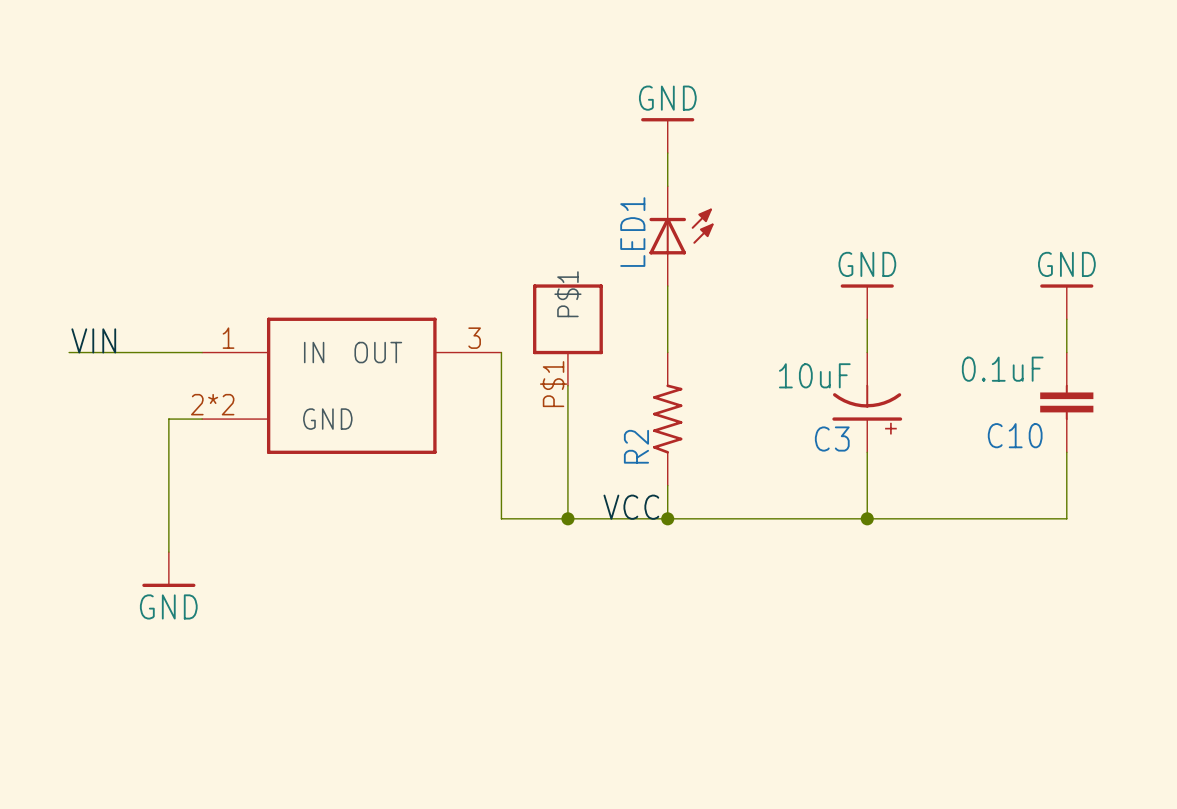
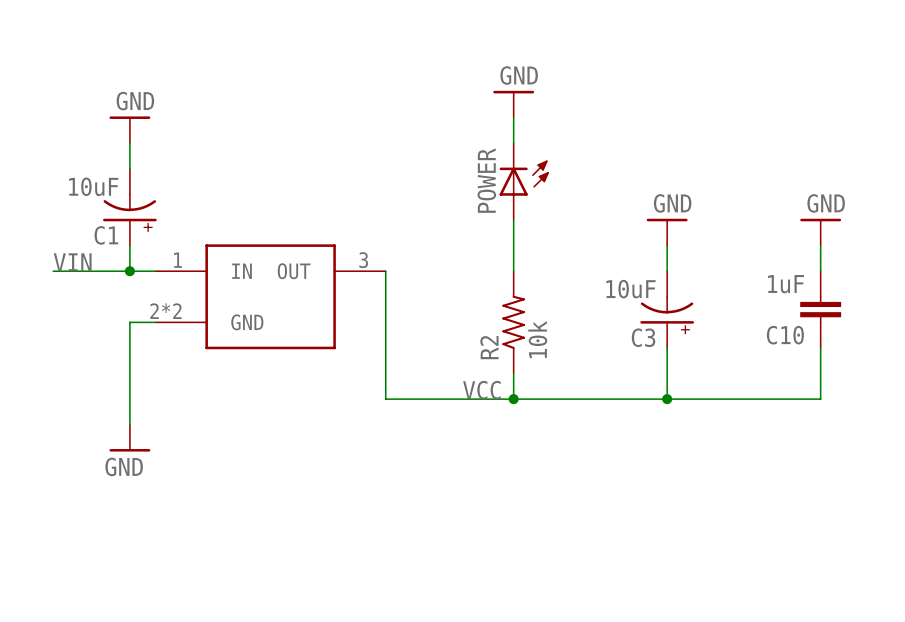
power symbol: none -> GND (129, 129)
wire: none -> (129, 143) (129, 168)
LED1 name: LED1 (632, 232) -> POWER (486, 180)
C1: none -> 10uF (129, 207)
wire: none -> (129, 245) (129, 271)
part: (567, 335) -> none
junction: none -> (129, 271)
C10 value: 0.1uF (1002, 369) -> 1uF (786, 284)
wire: (567, 385) (567, 518) -> none
R2 value: none -> 10k (537, 339)
junction: (567, 518) -> none

